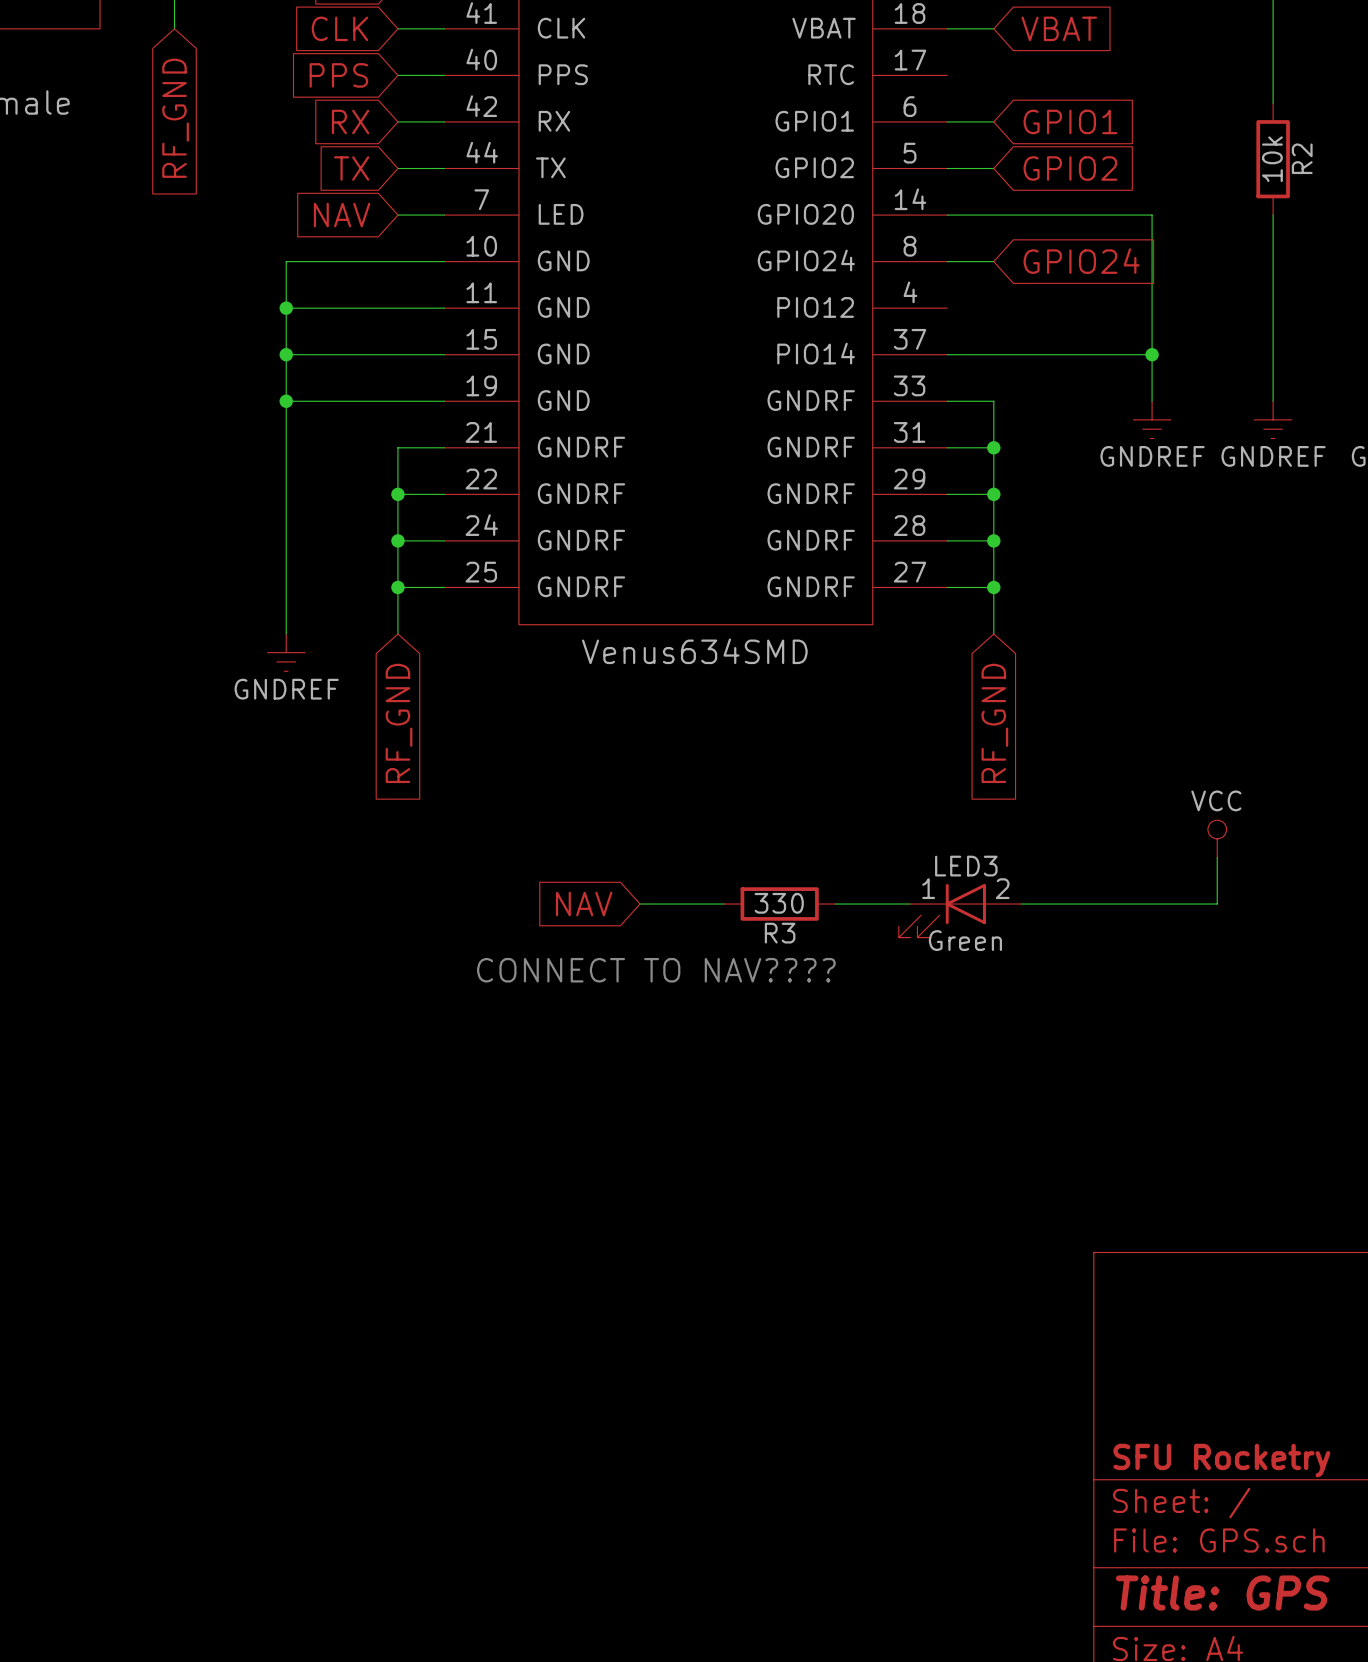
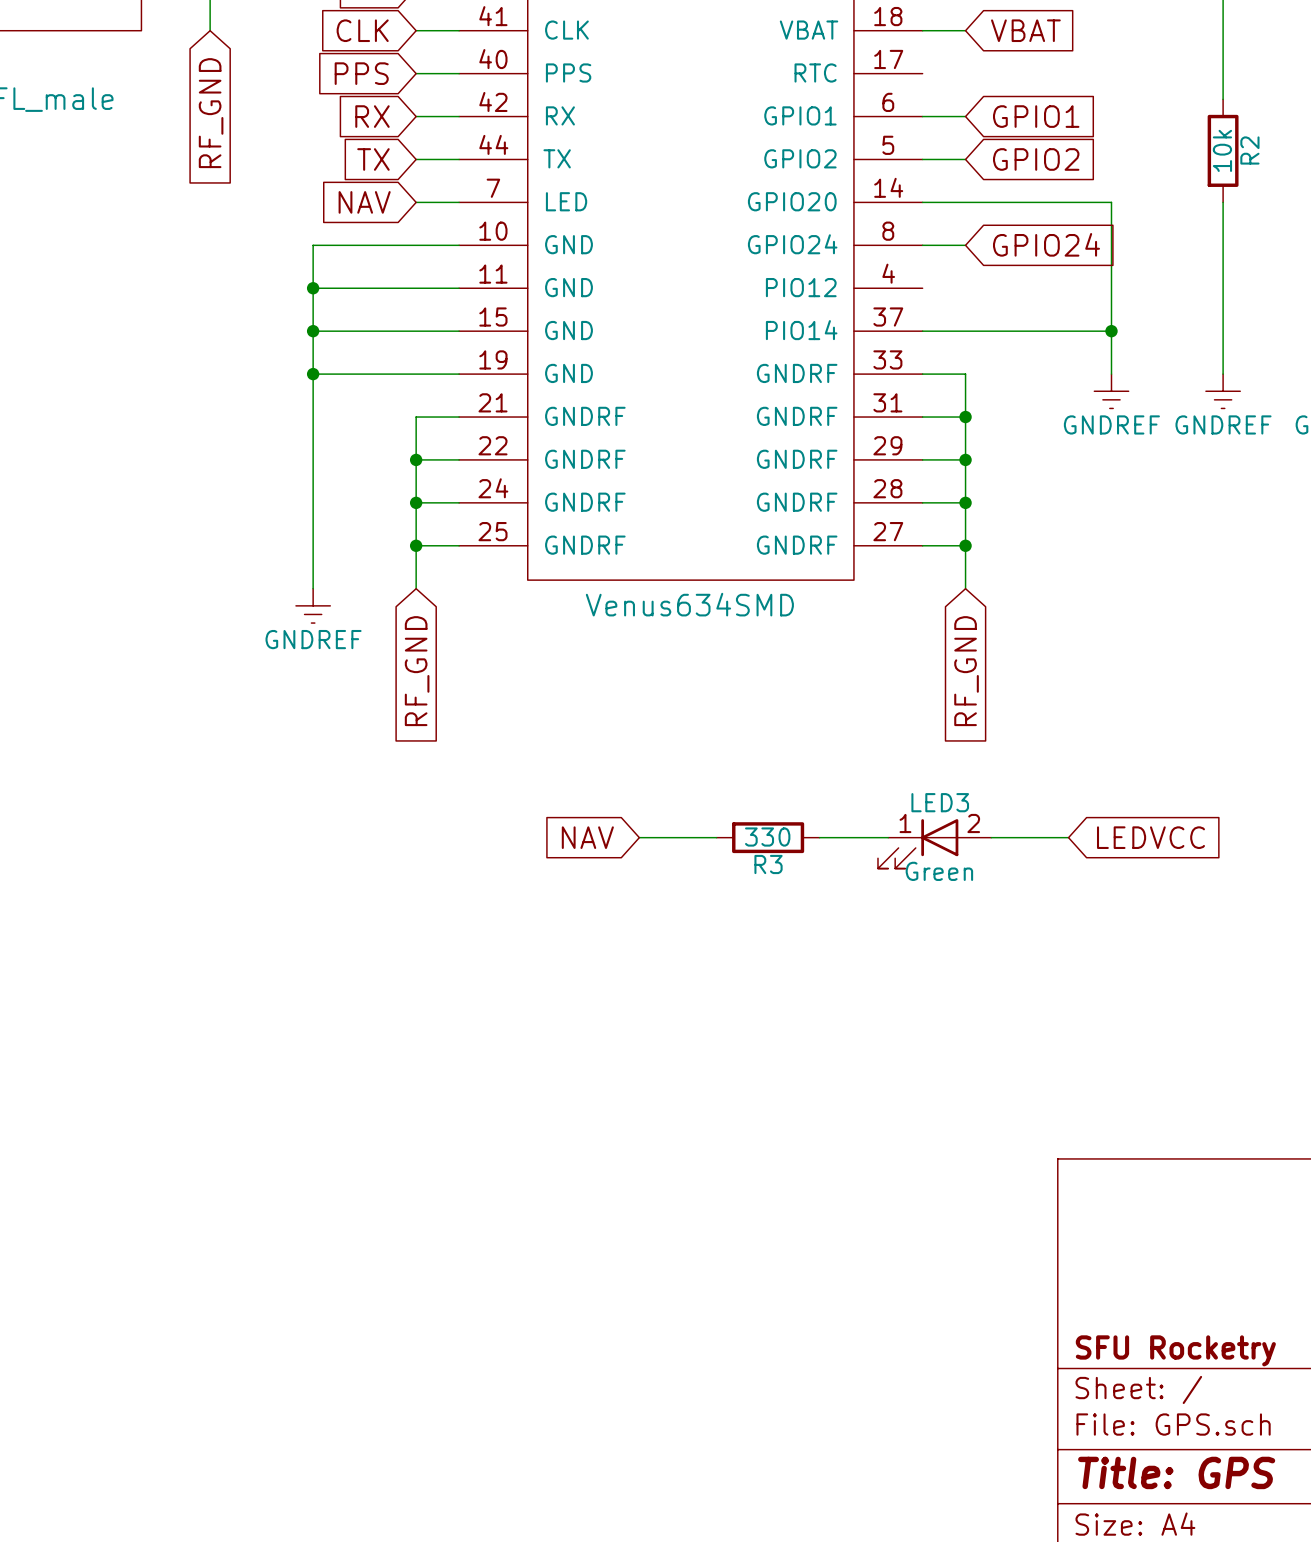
power symbol: VCC (1217, 838) -> none
wire: (1217, 857) (1217, 904) (1105, 904) -> none
global label: none -> LEDVCC (1150, 837)
text: CONNECT TO NAV???? (656, 970) -> none

